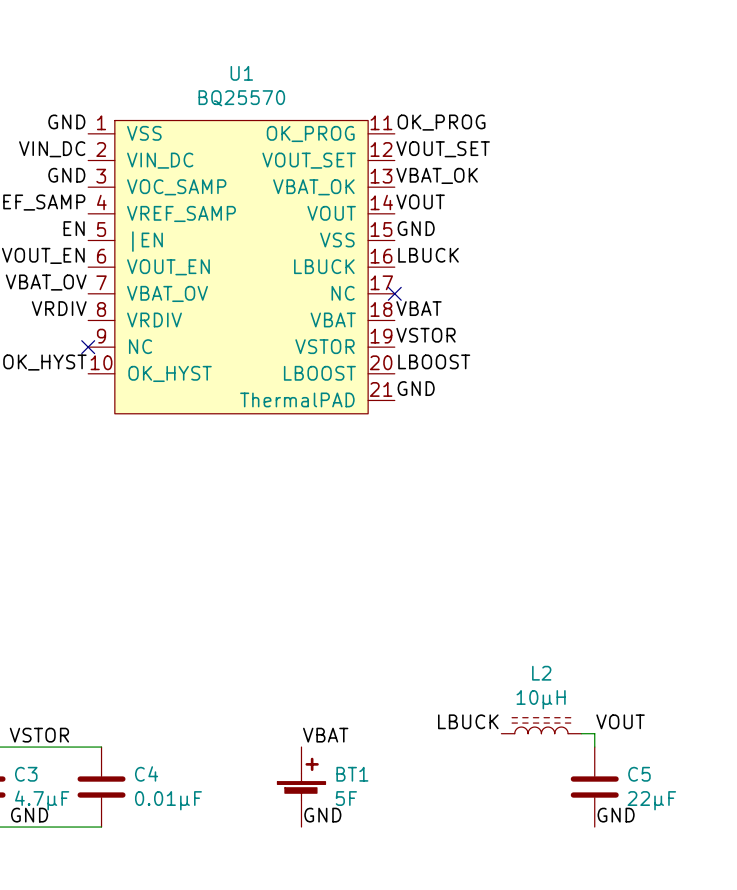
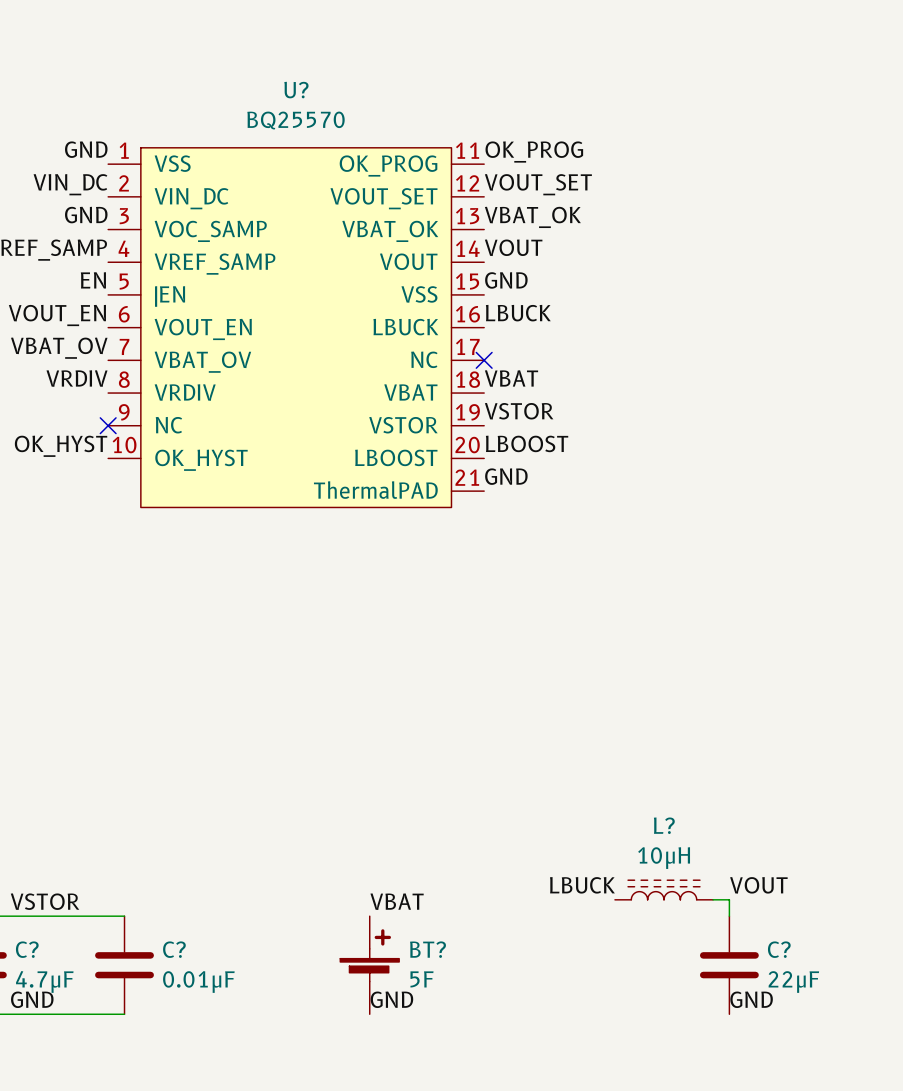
U1 name: U1 (241, 73) -> U? (296, 90)
L2 name: L2 (541, 673) -> L? (664, 825)
C4 name: C4 (146, 773) -> C? (174, 949)
C3 name: C3 (26, 774) -> C? (27, 949)
BT1 name: BT1 (352, 774) -> BT? (428, 949)
C5 name: C5 (639, 774) -> C? (779, 949)

